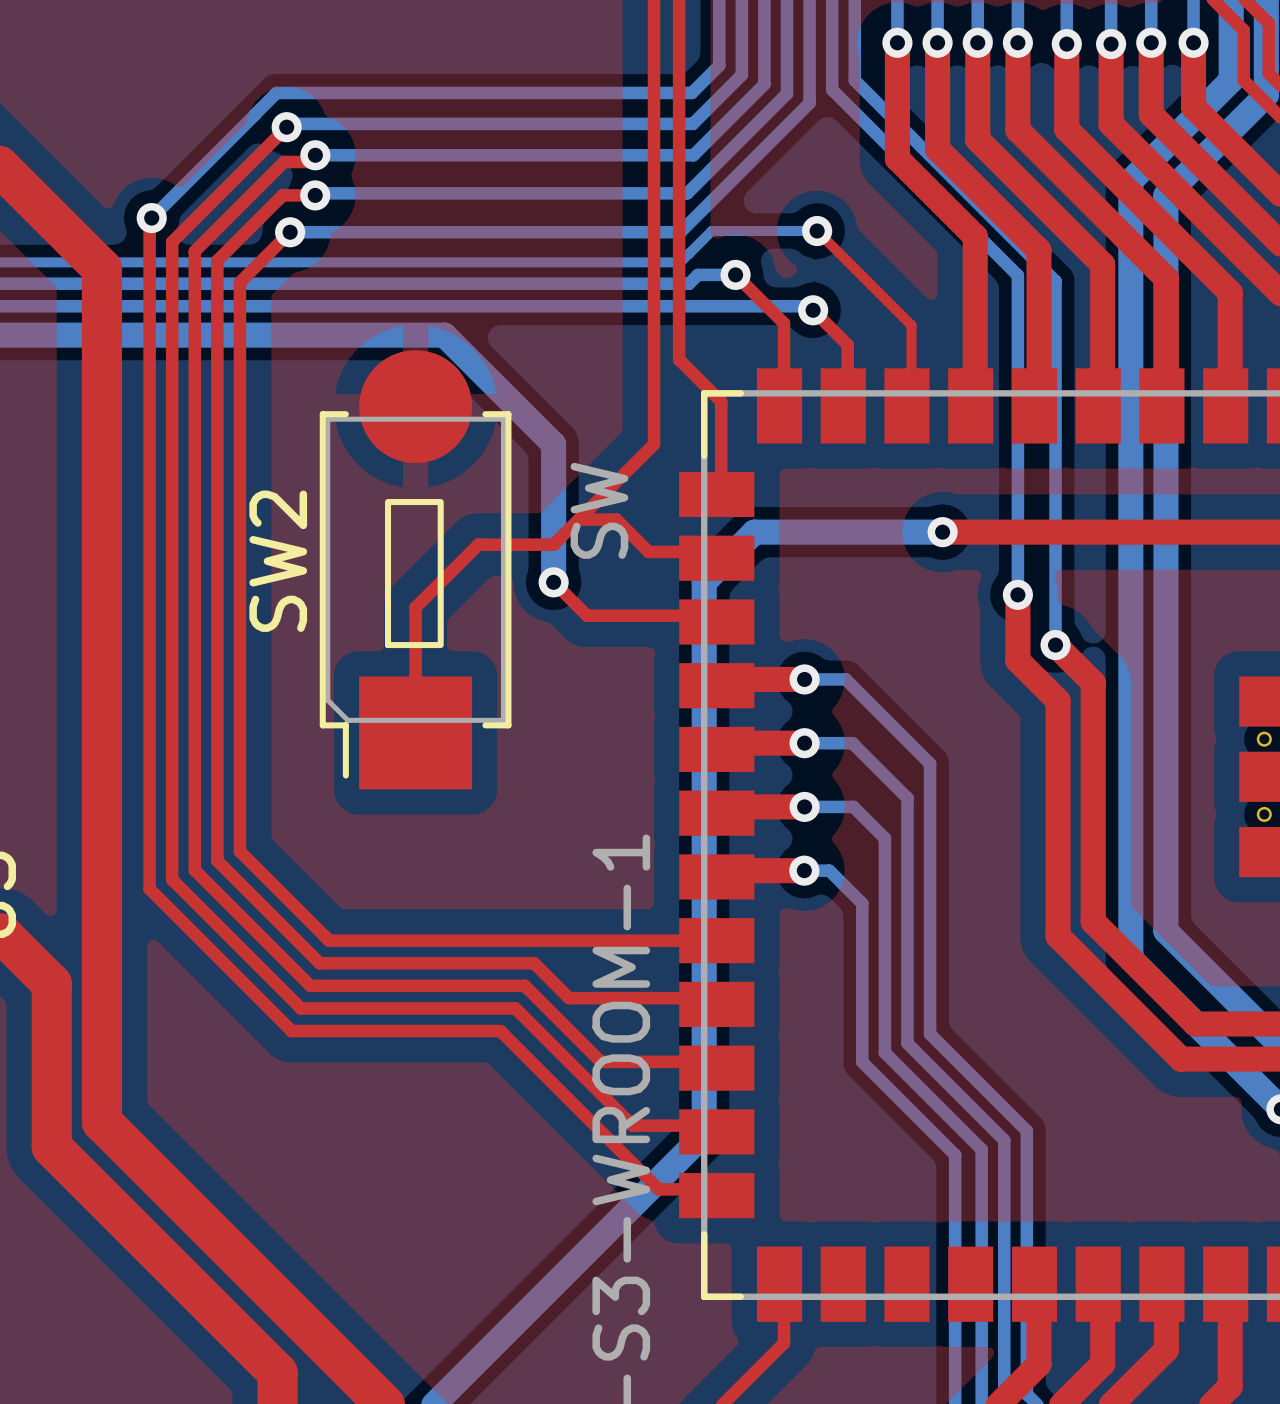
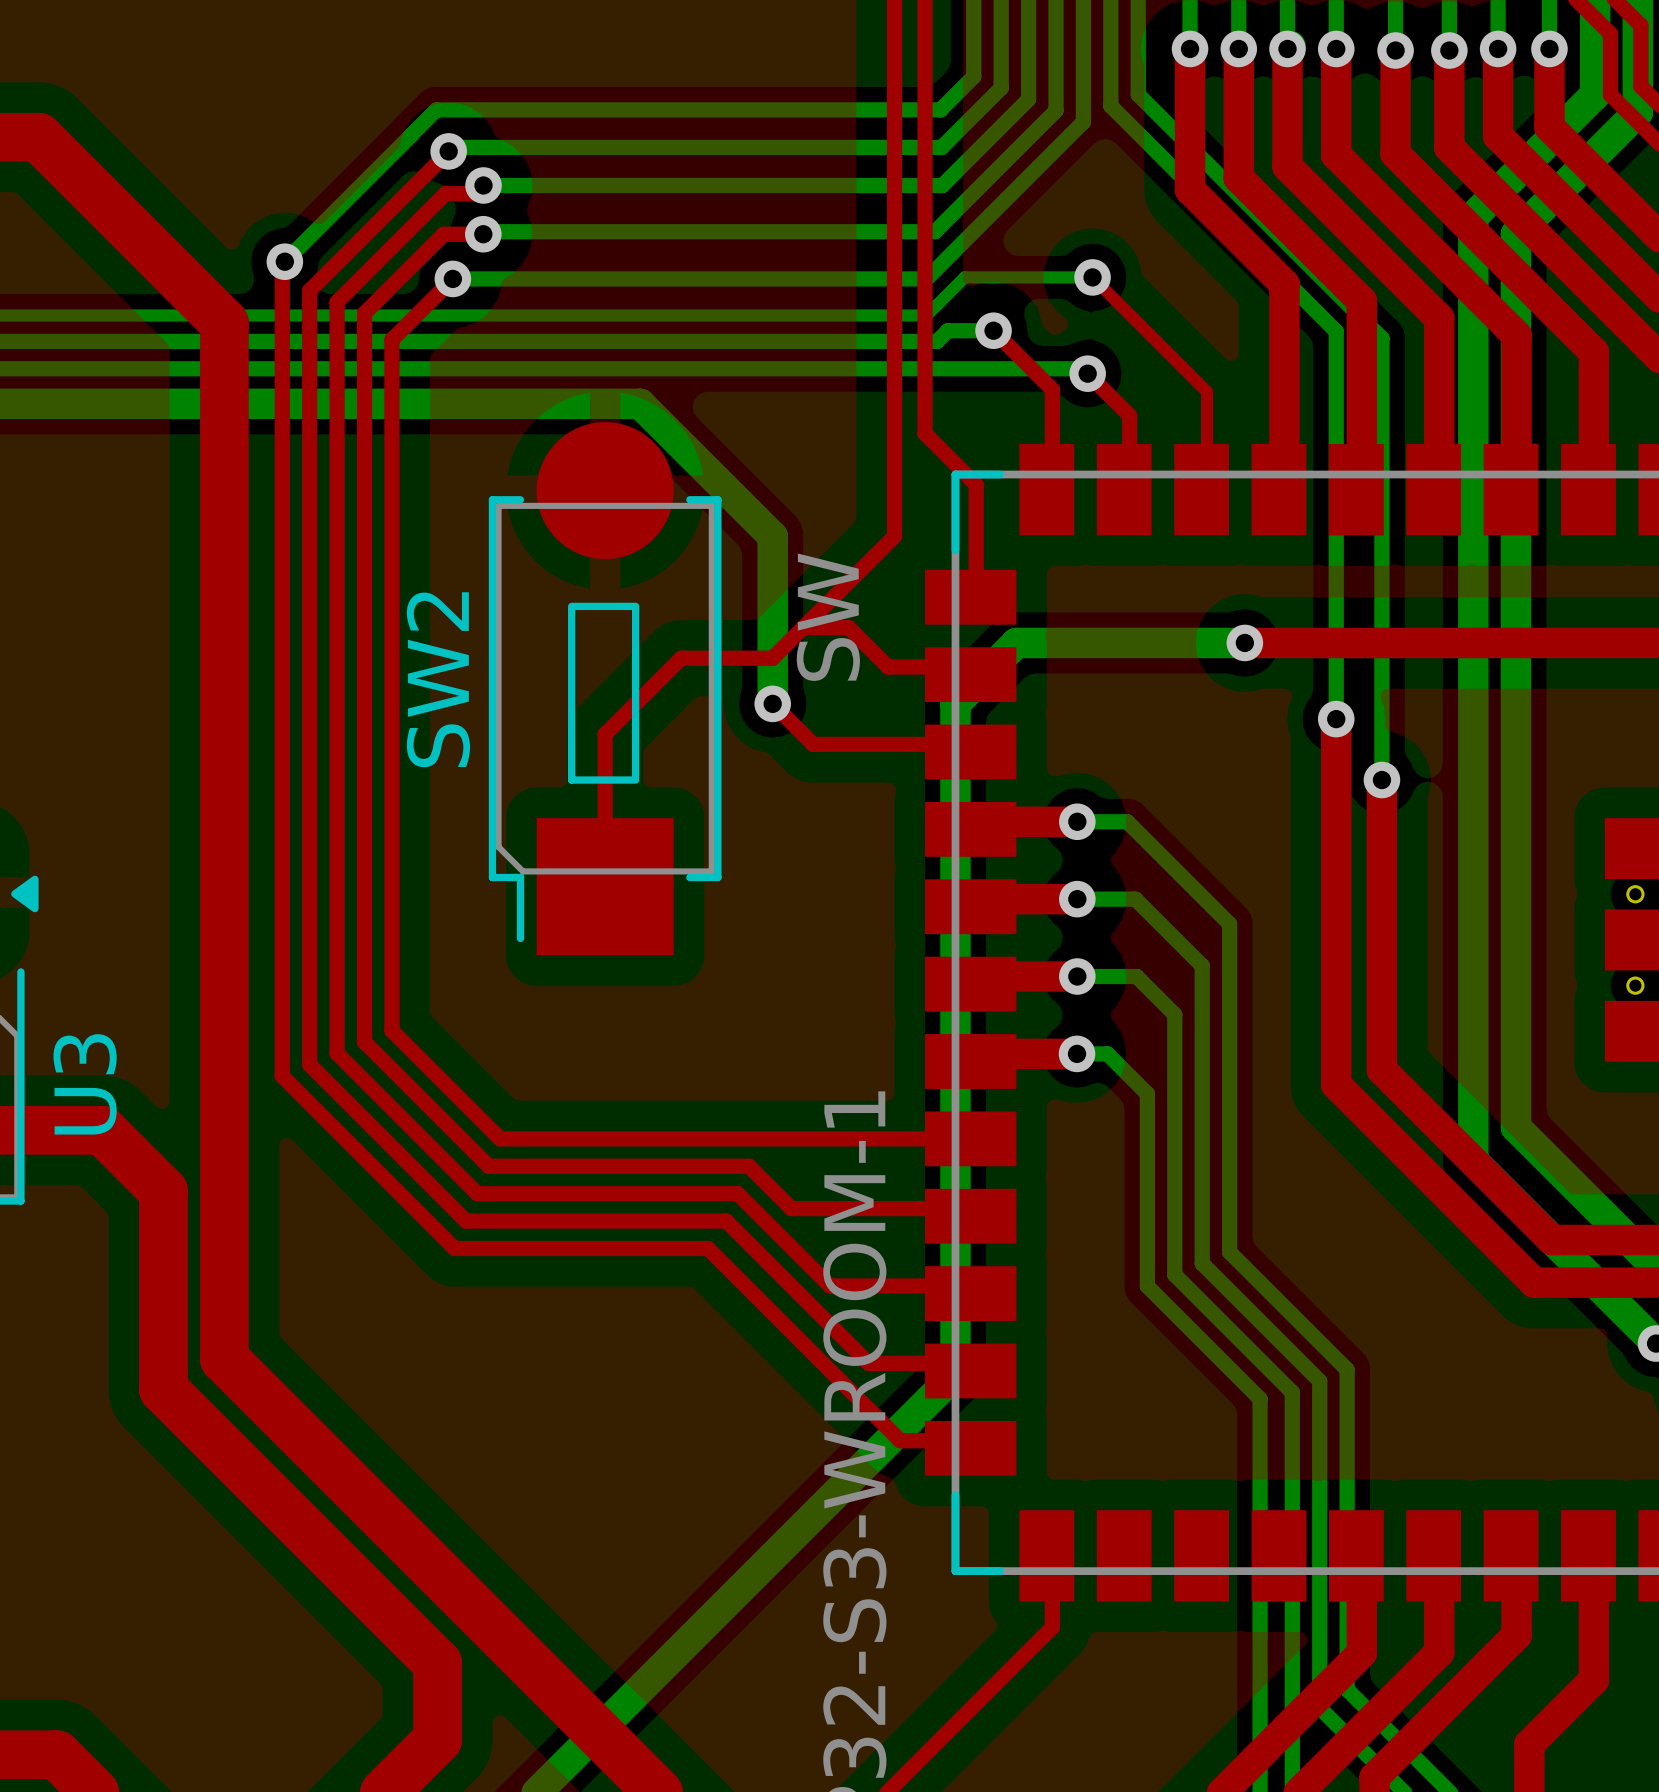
top track: (1055, 645) (1093, 682) (1093, 921) -> (1381, 780) (1381, 1070) (1427, 1115)
top track: (1017, 660) (1058, 700) (1058, 936) -> (1336, 798) (1336, 1084) (1384, 1133)

